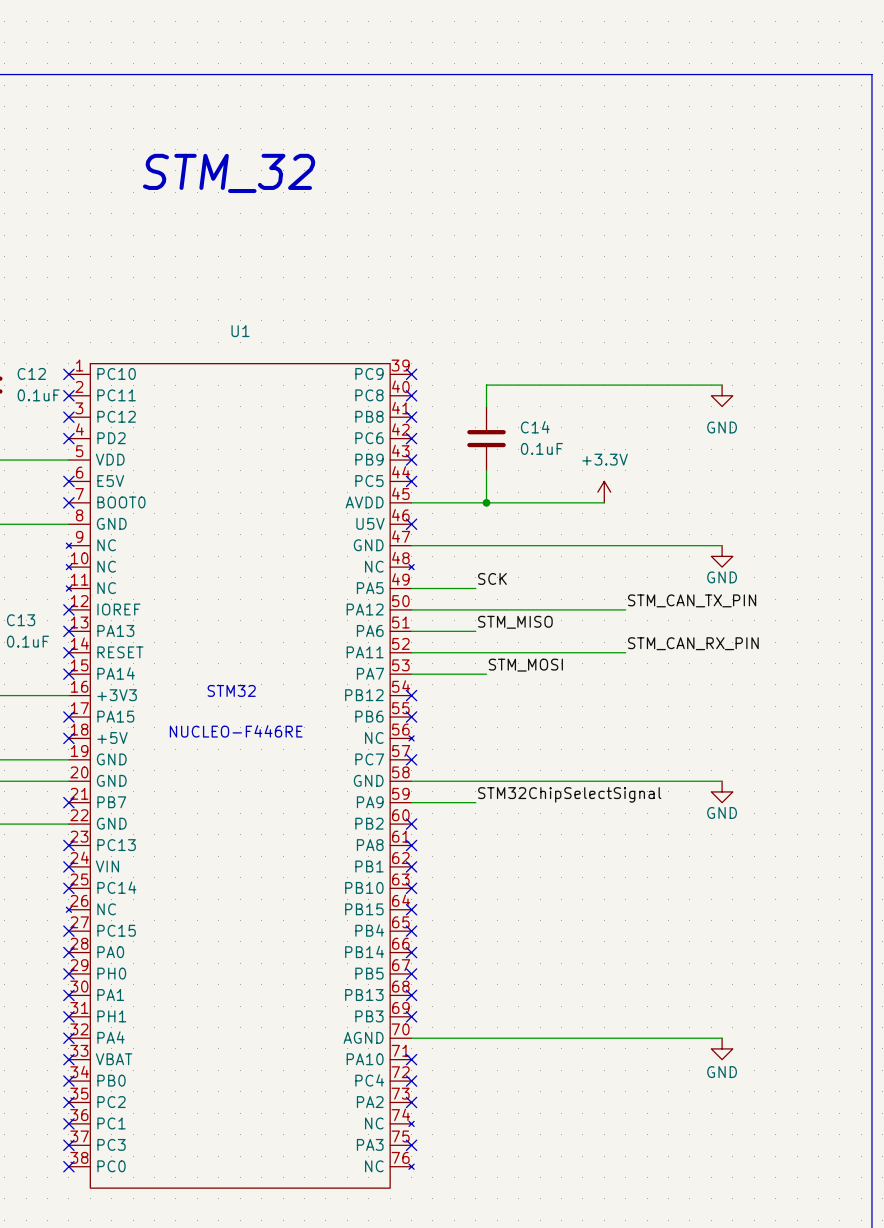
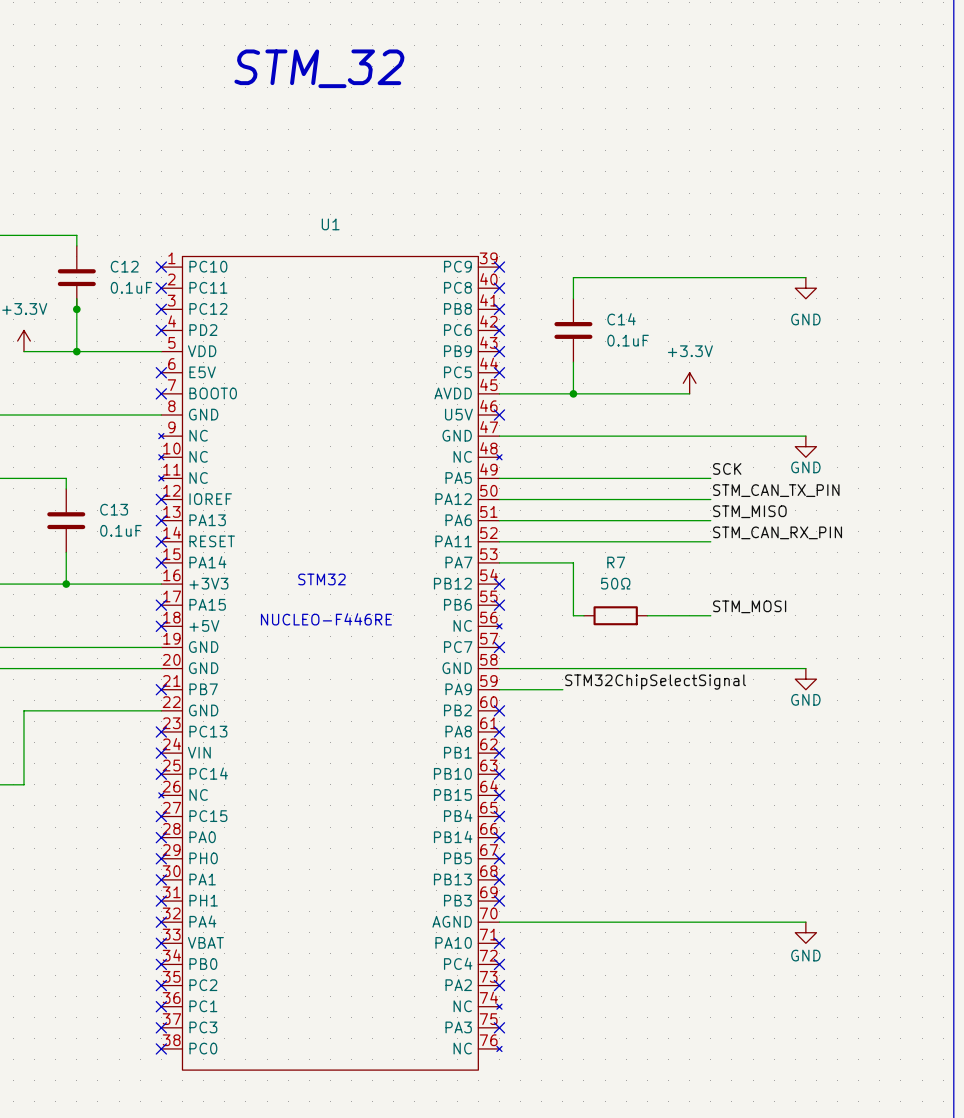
label position: SCK (492, 578) -> SCK (727, 468)
wire: none -> (562, 478) (710, 478)
label position: STM_MISO (515, 622) -> STM_MISO (749, 511)
wire: none -> (562, 520) (710, 520)
label position: STM_MOSI (525, 665) -> STM_MOSI (749, 606)
wire: none -> (573, 562) (573, 615) (583, 615)
R7: none -> 50Ω (615, 615)
wire: none -> (647, 615) (710, 615)

